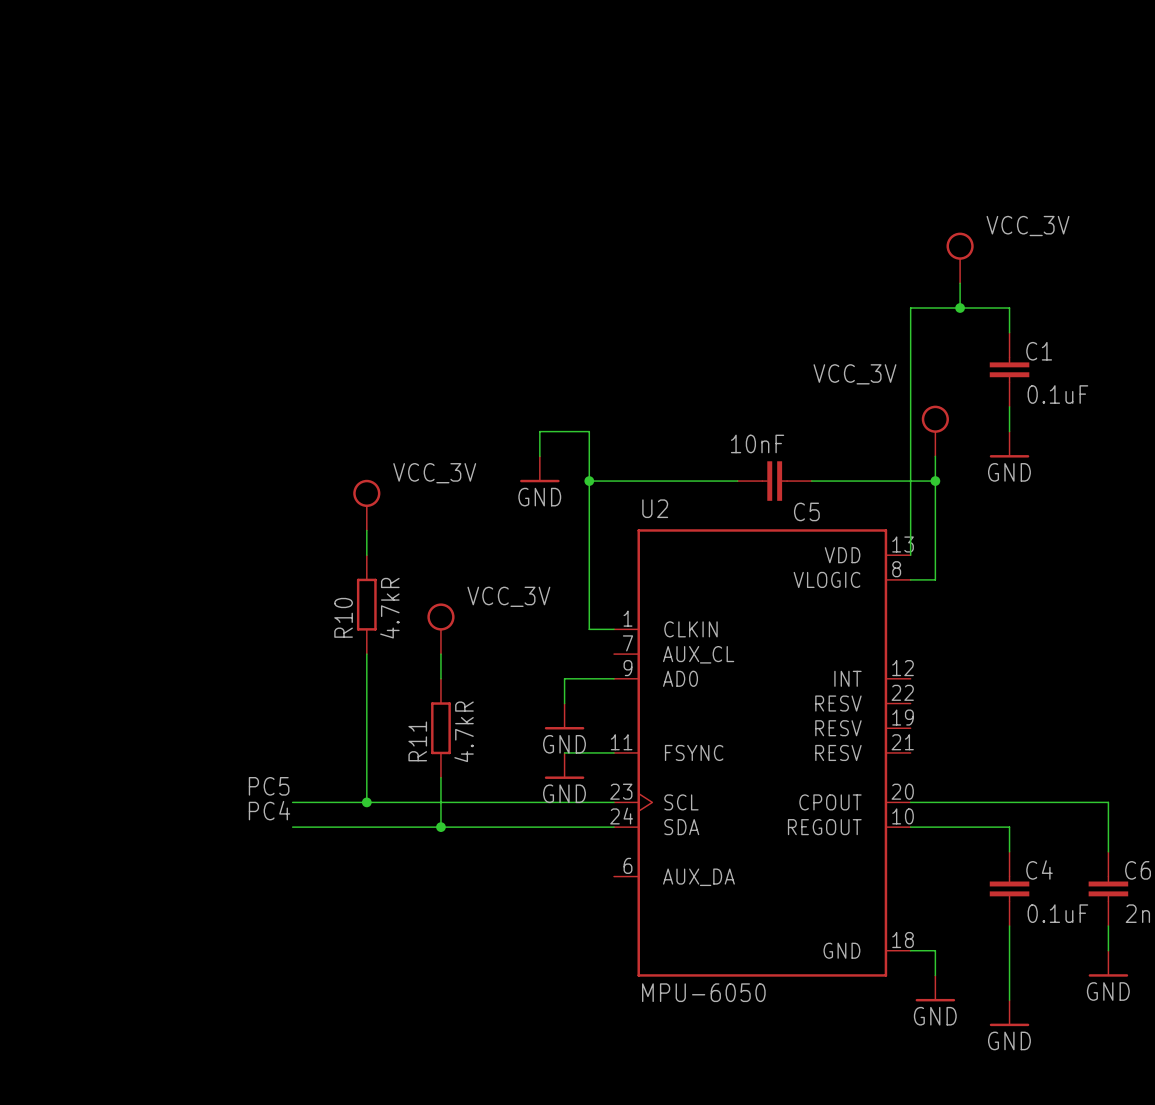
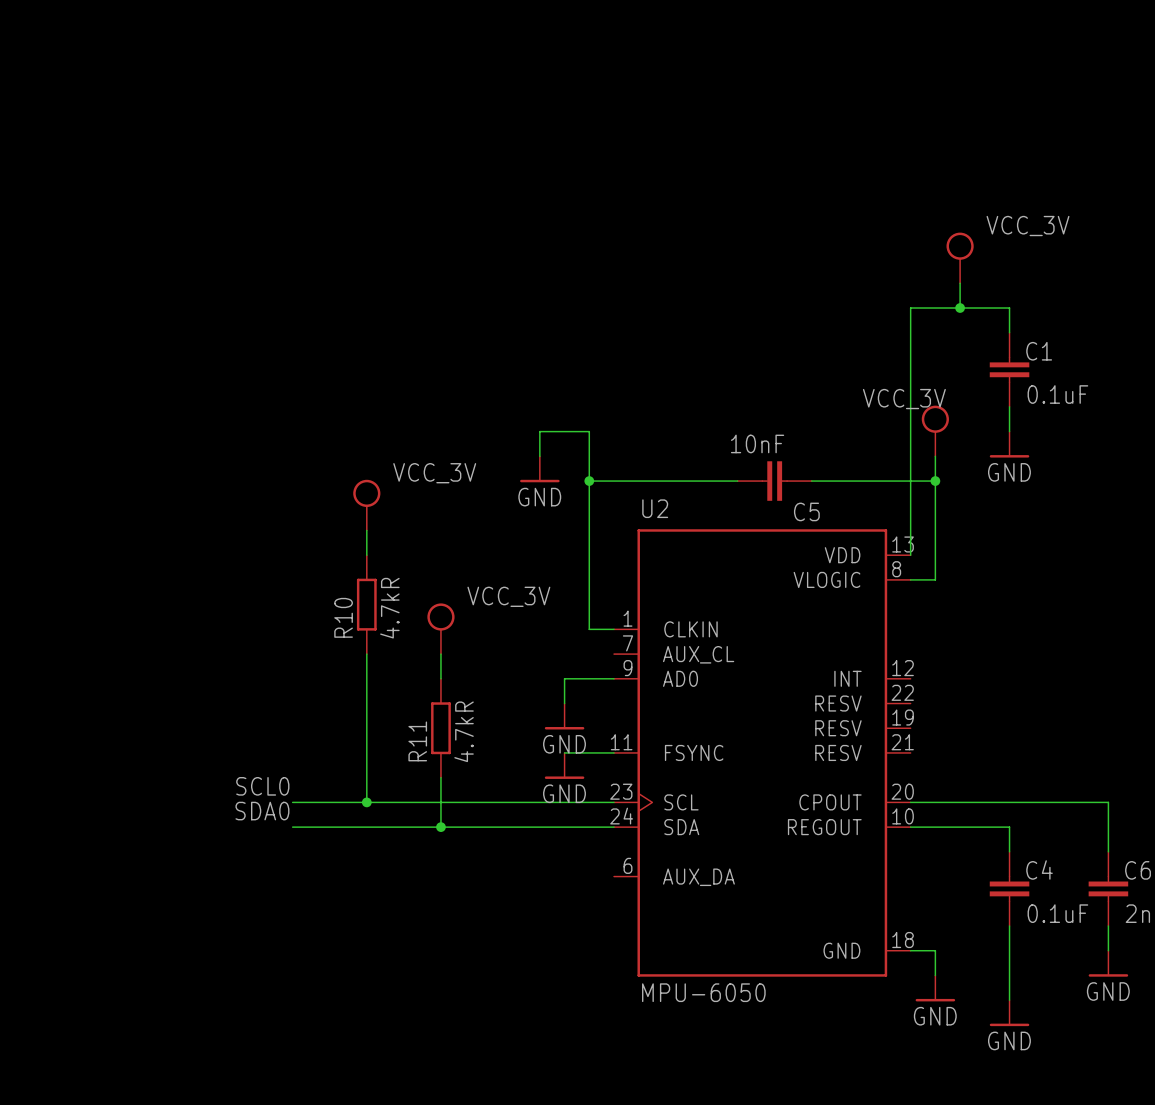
power symbol text position: VCC_3V (854, 374) -> VCC_3V (904, 399)
label: PC5 (269, 786) -> SCL0 (262, 786)
label: PC4 (269, 810) -> SDA0 (262, 811)

